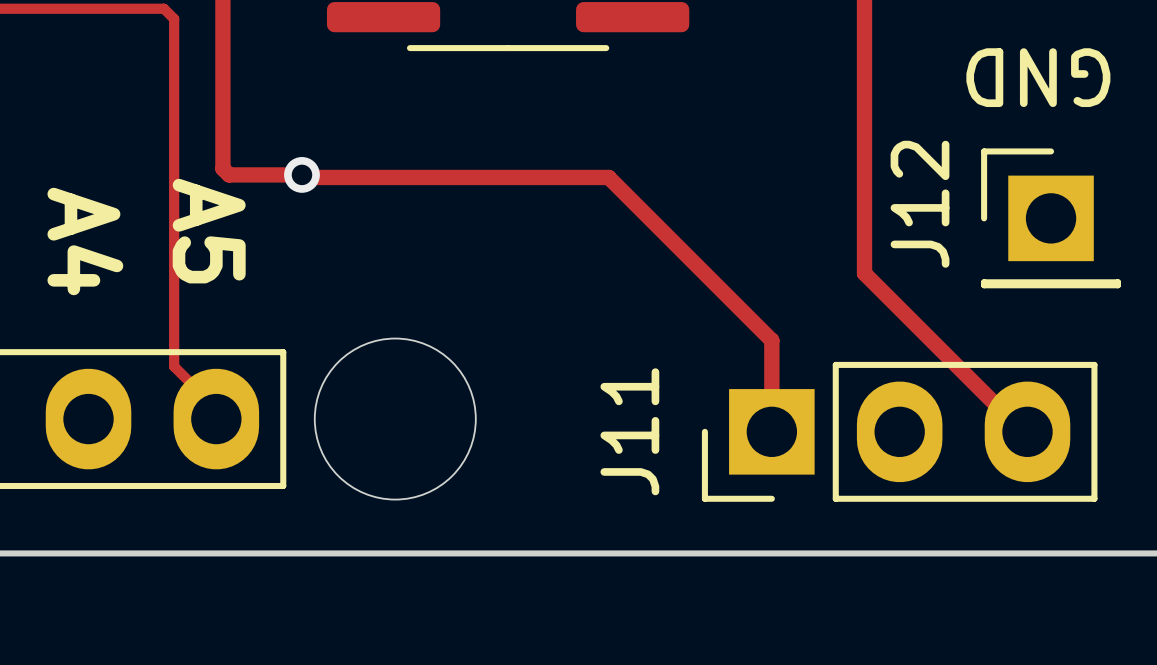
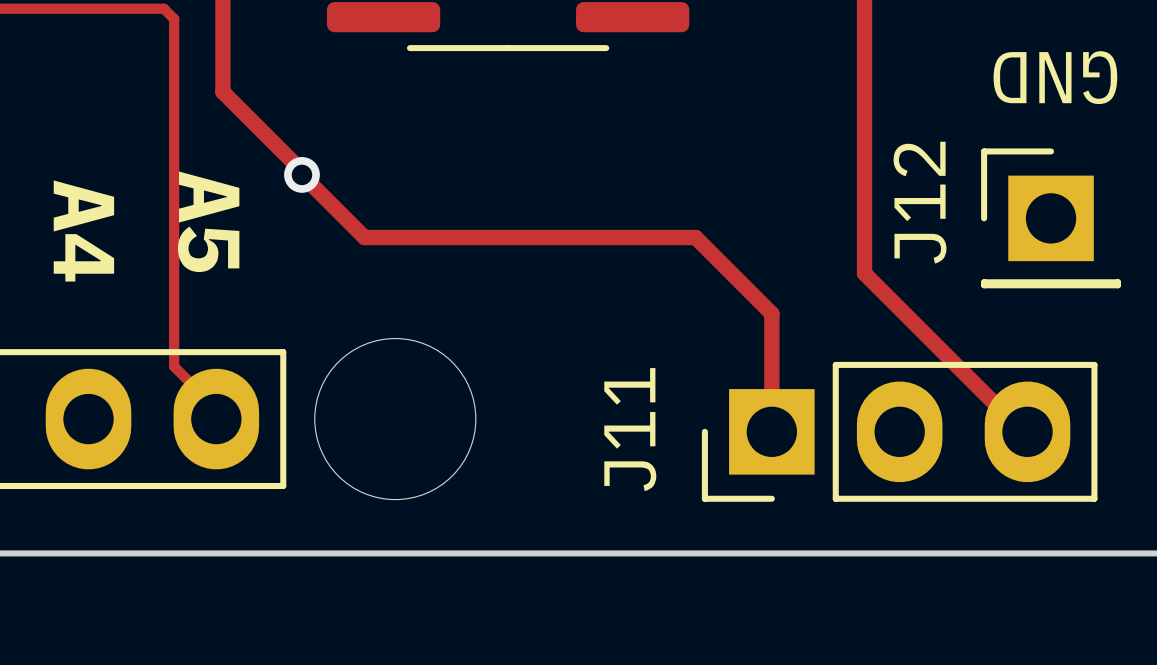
track: (222, 92) (222, 168) (229, 174) (301, 174) -> (222, 92) (301, 171) (301, 174)
track: (304, 177) (608, 177) (771, 340) -> (304, 177) (364, 237) (695, 237) (771, 313) (771, 340)

